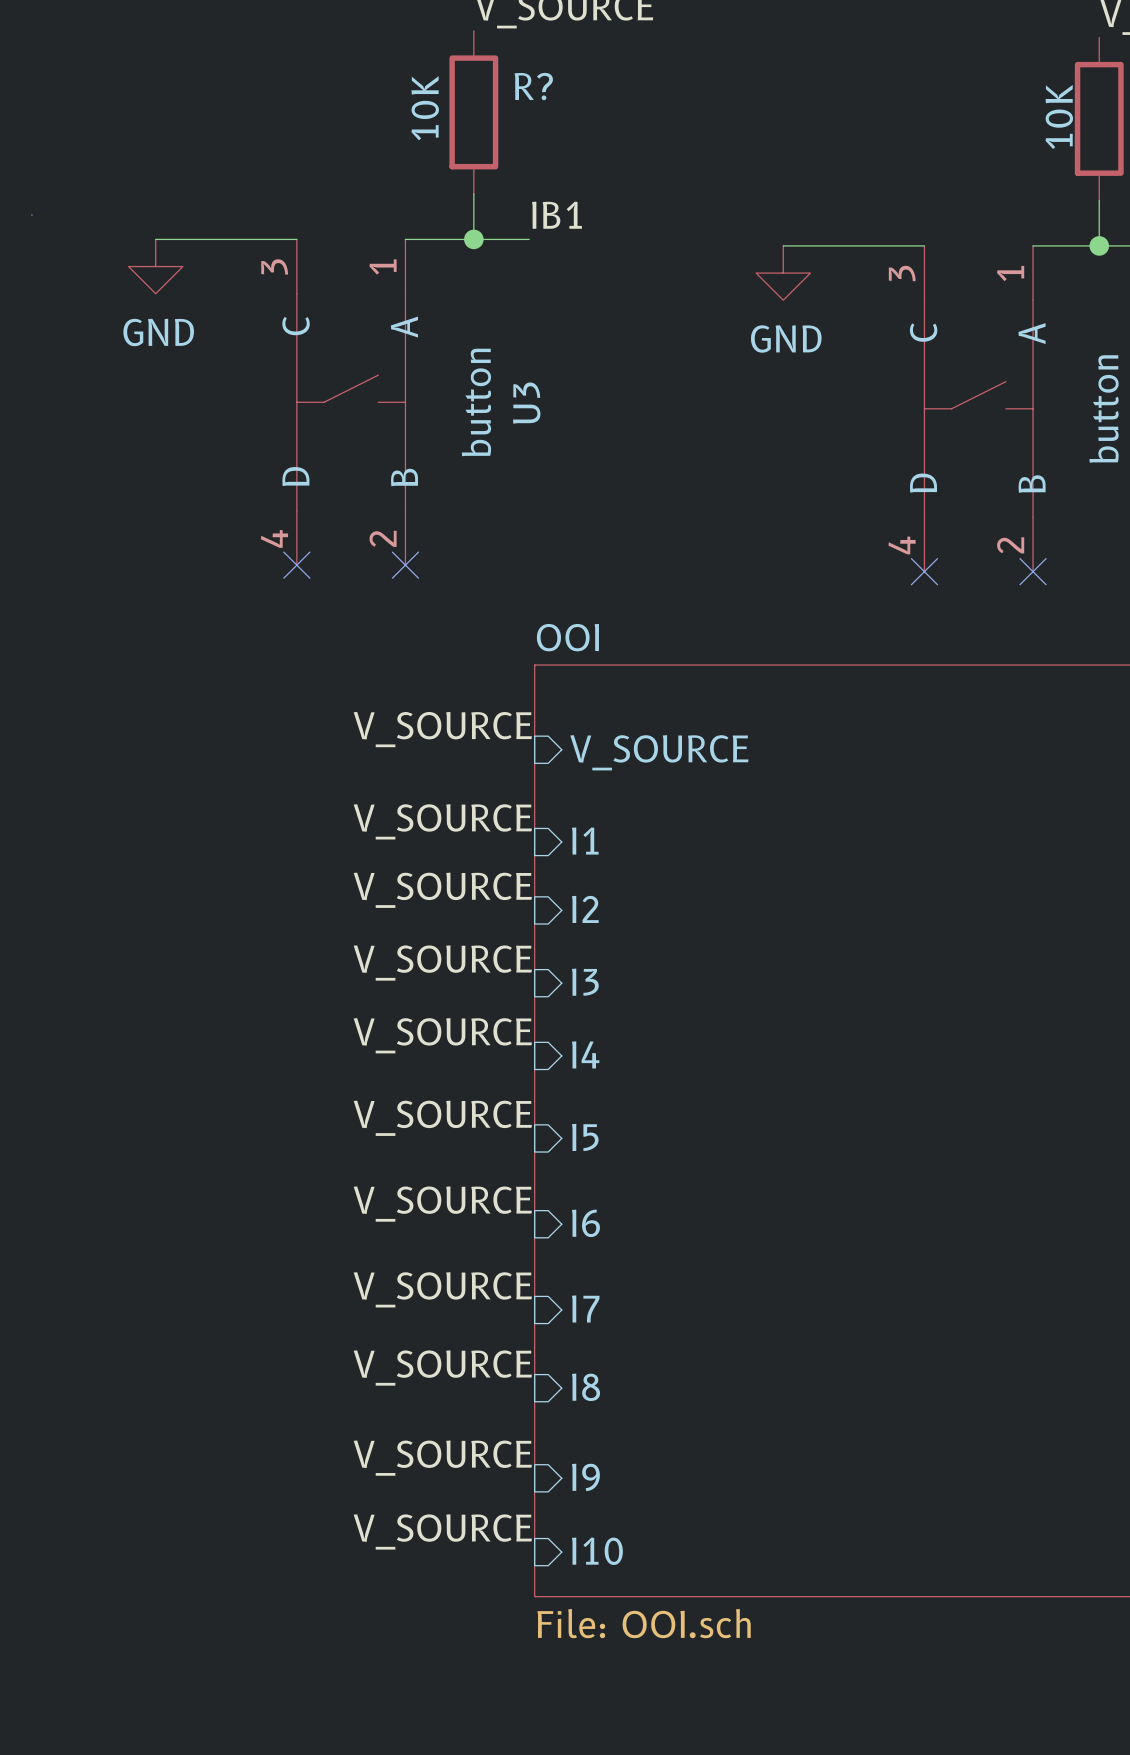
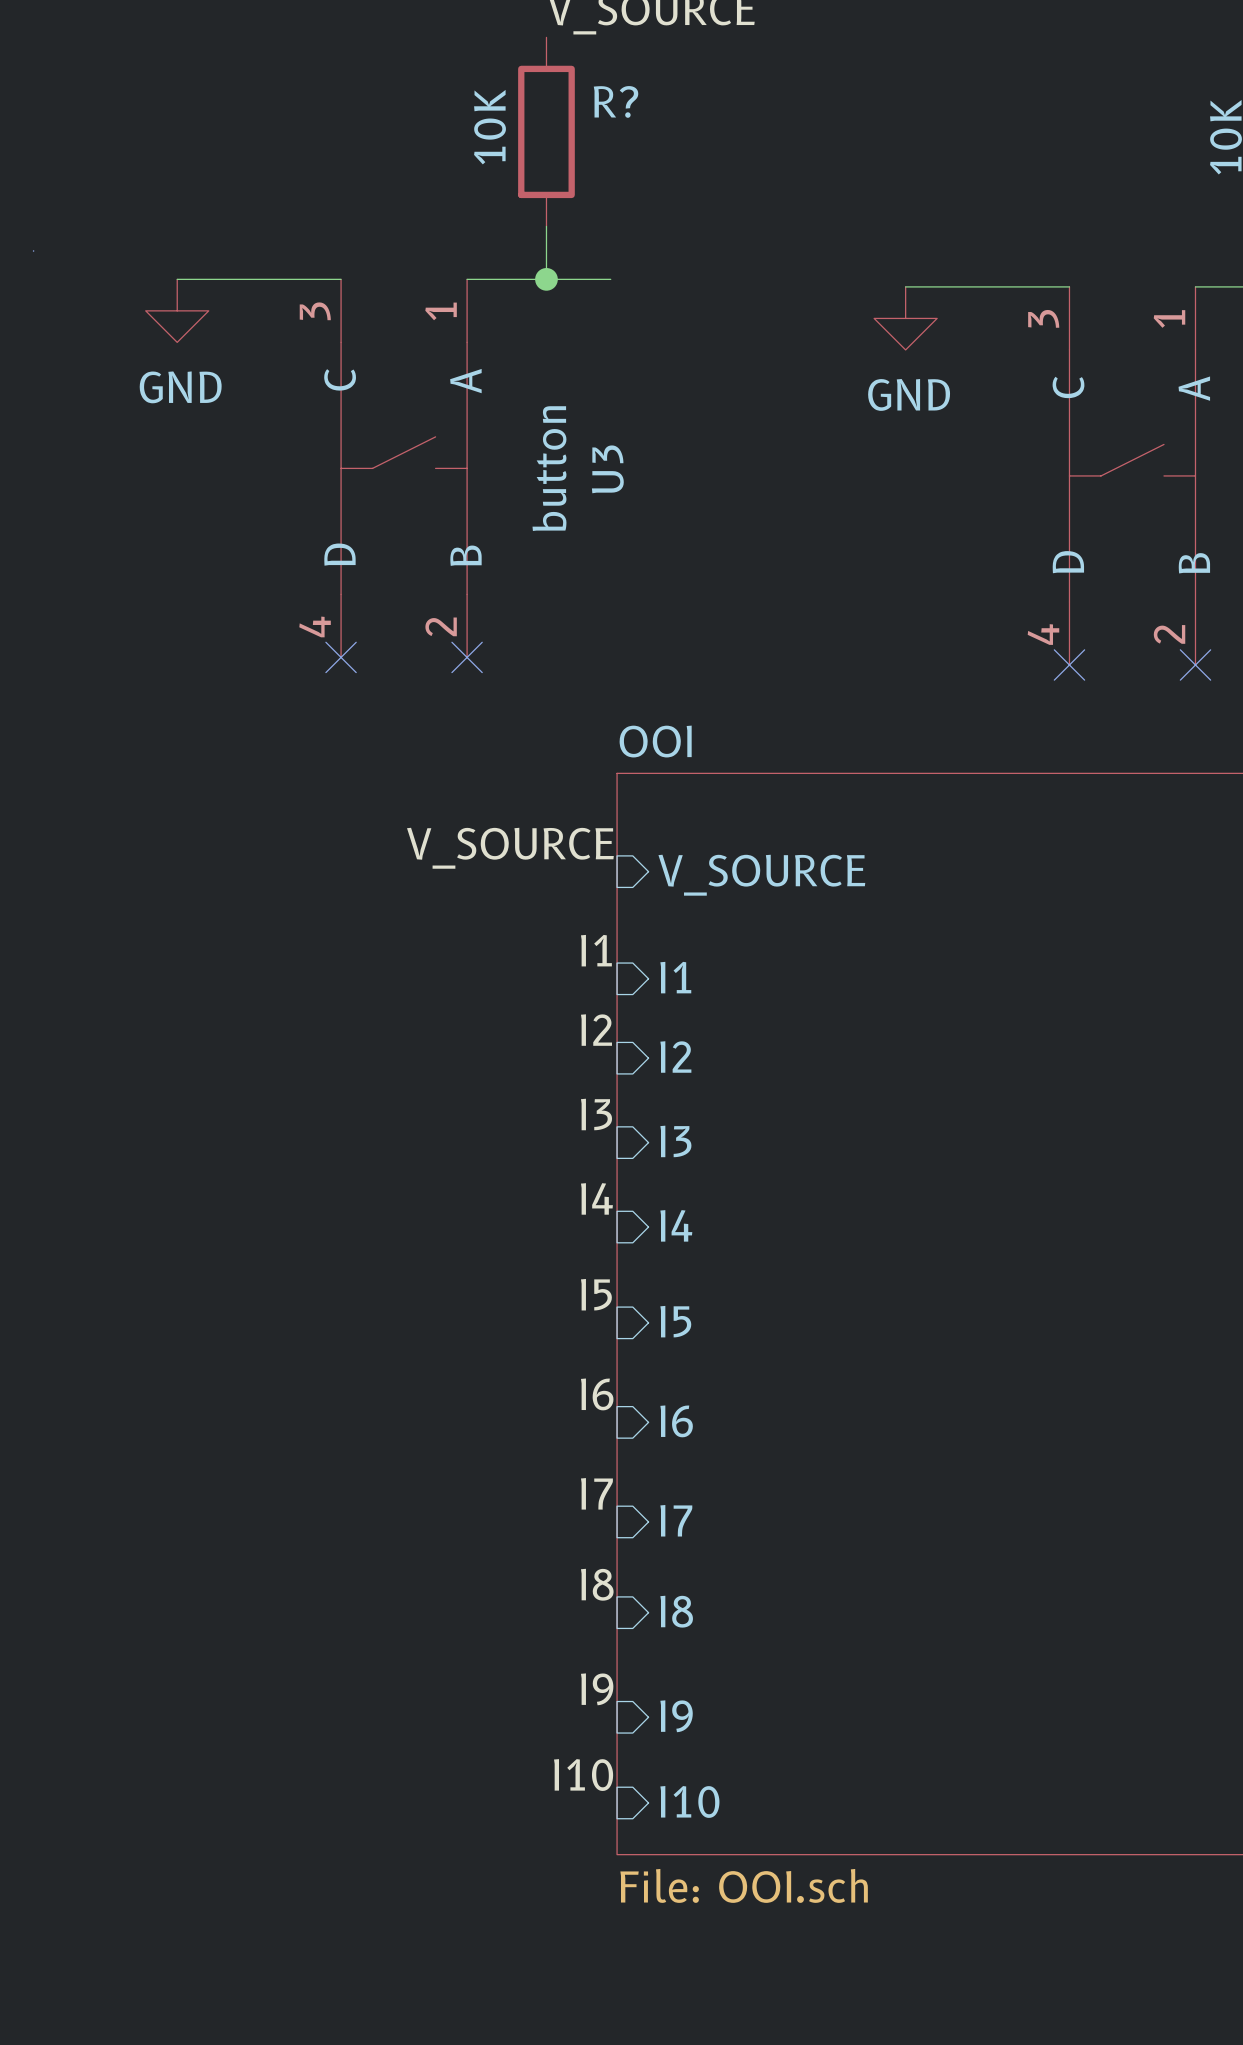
label: IB1 (556, 215) -> none
label: V_SOURCE (442, 821) -> I1 (596, 950)
label: V_SOURCE (442, 890) -> I2 (596, 1030)
label: V_SOURCE (442, 963) -> I3 (596, 1114)
label: V_SOURCE (442, 1035) -> I4 (596, 1198)
label: V_SOURCE (442, 1118) -> I5 (596, 1294)
label: V_SOURCE (442, 1204) -> I6 (597, 1394)
label: V_SOURCE (442, 1289) -> I7 (596, 1493)
label: V_SOURCE (442, 1368) -> I8 (597, 1584)
label: V_SOURCE (442, 1458) -> I9 (597, 1689)
label: V_SOURCE (442, 1531) -> I10 (583, 1775)

